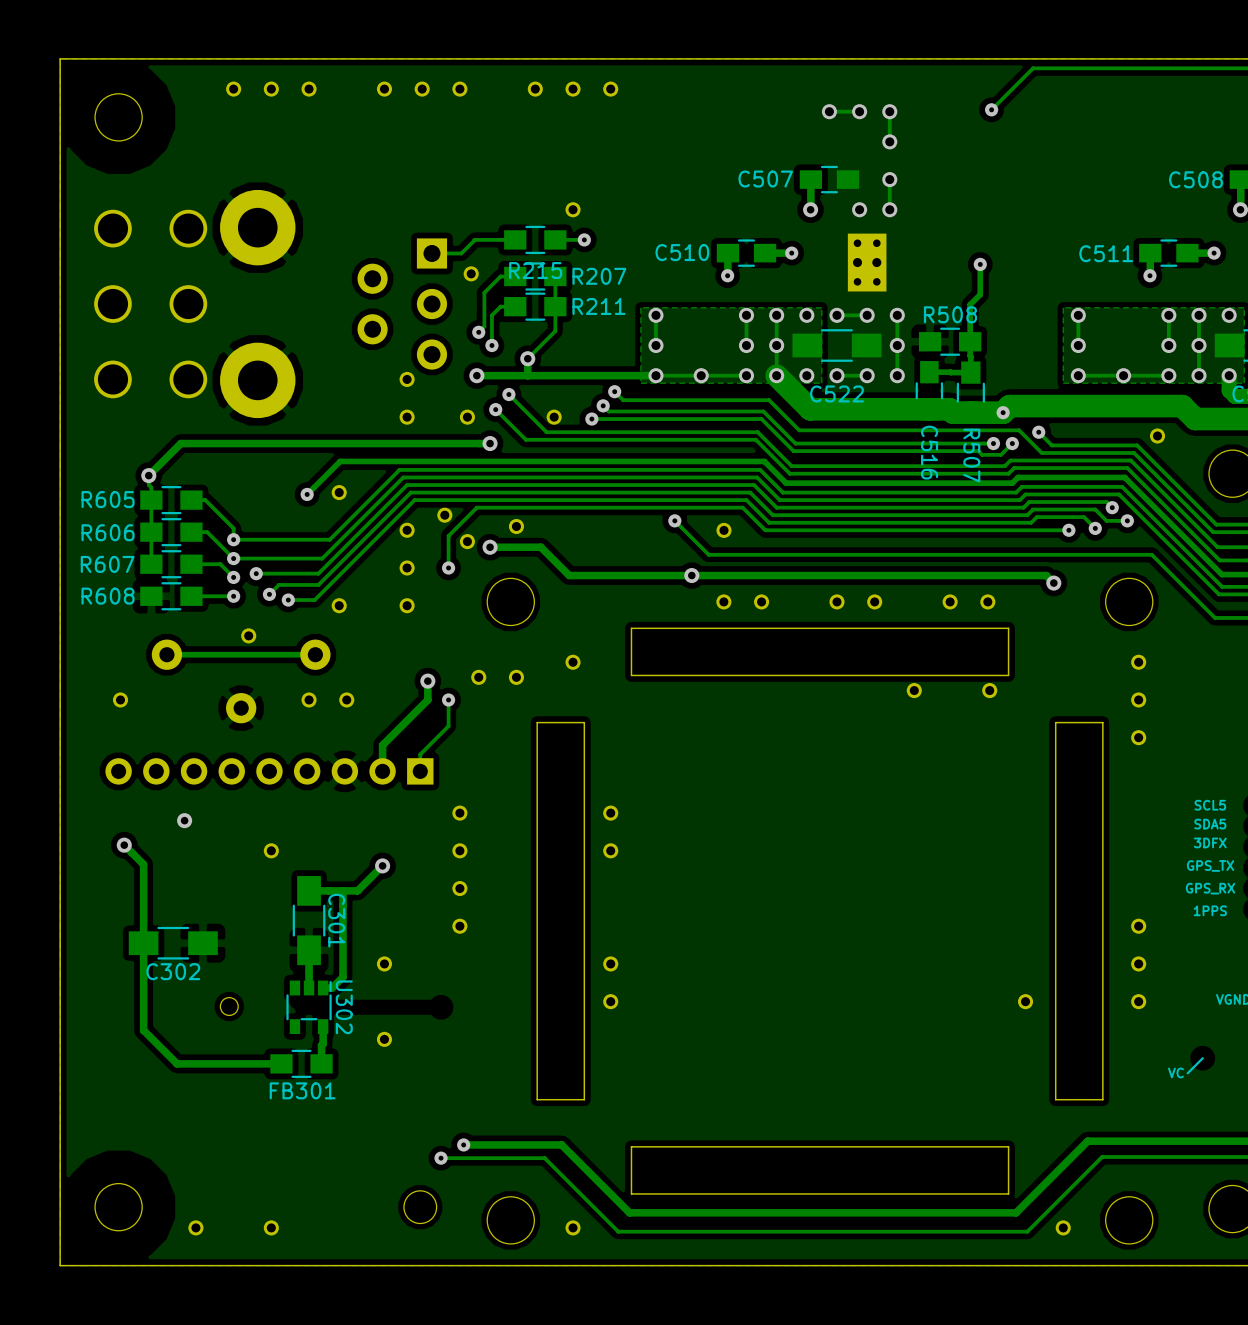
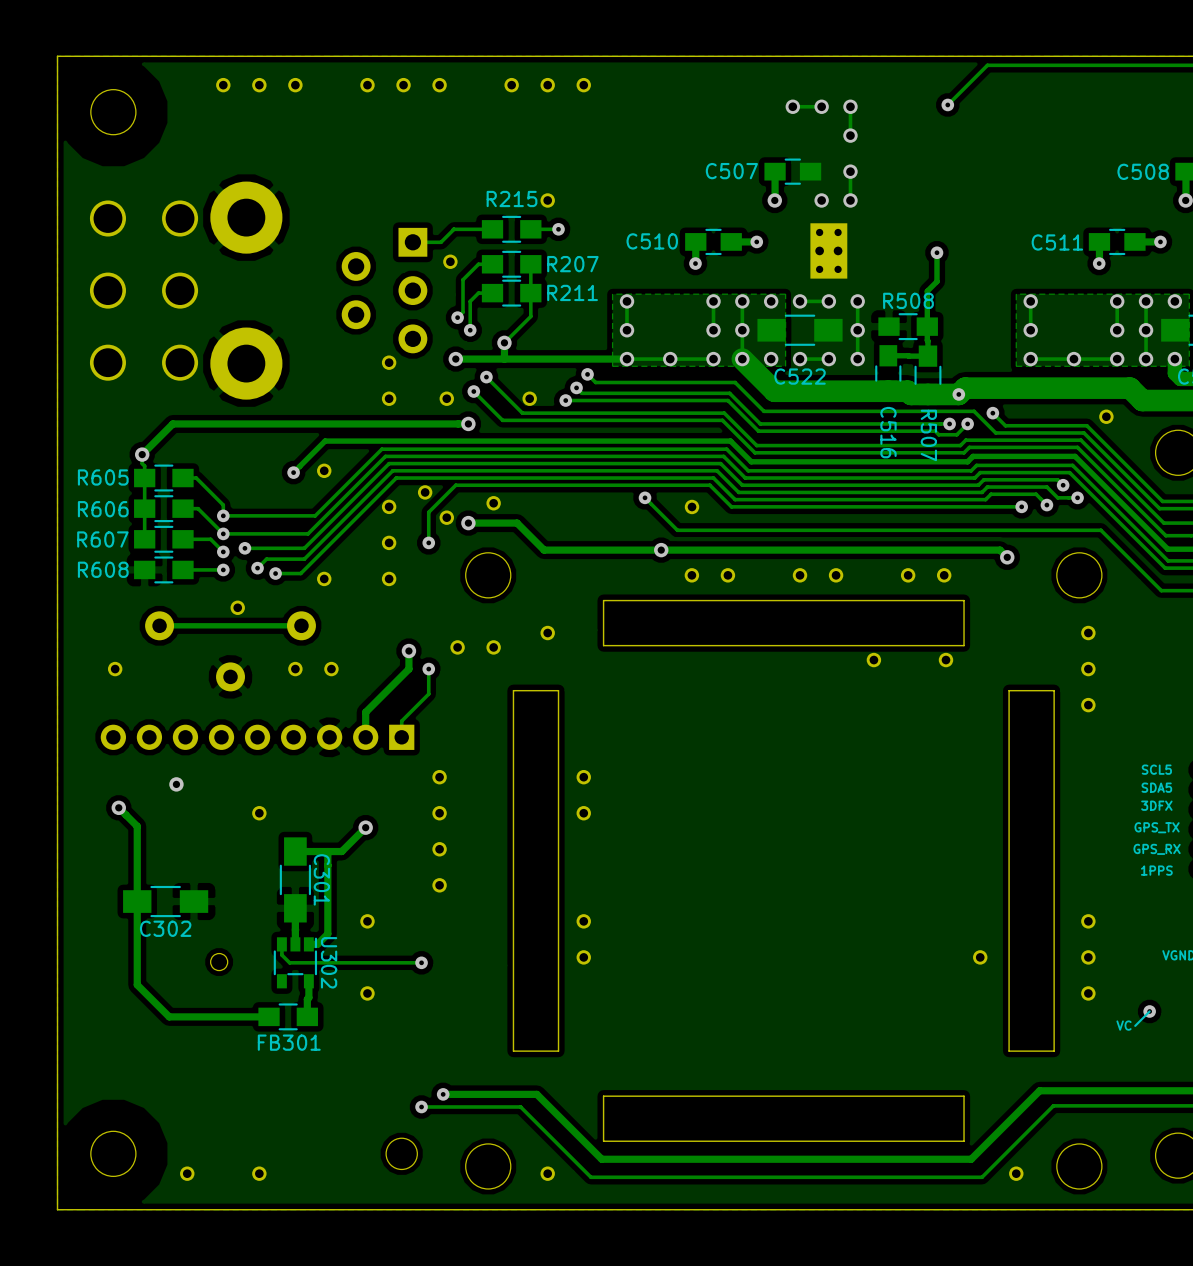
R215 name position: R215 (535, 270) -> R215 (512, 198)
part position: (1138, 926) -> (1088, 993)
track: none -> (281, 944) (281, 955) (289, 962) (421, 962)
via: none -> (421, 962)
via: none -> (1149, 1011)

